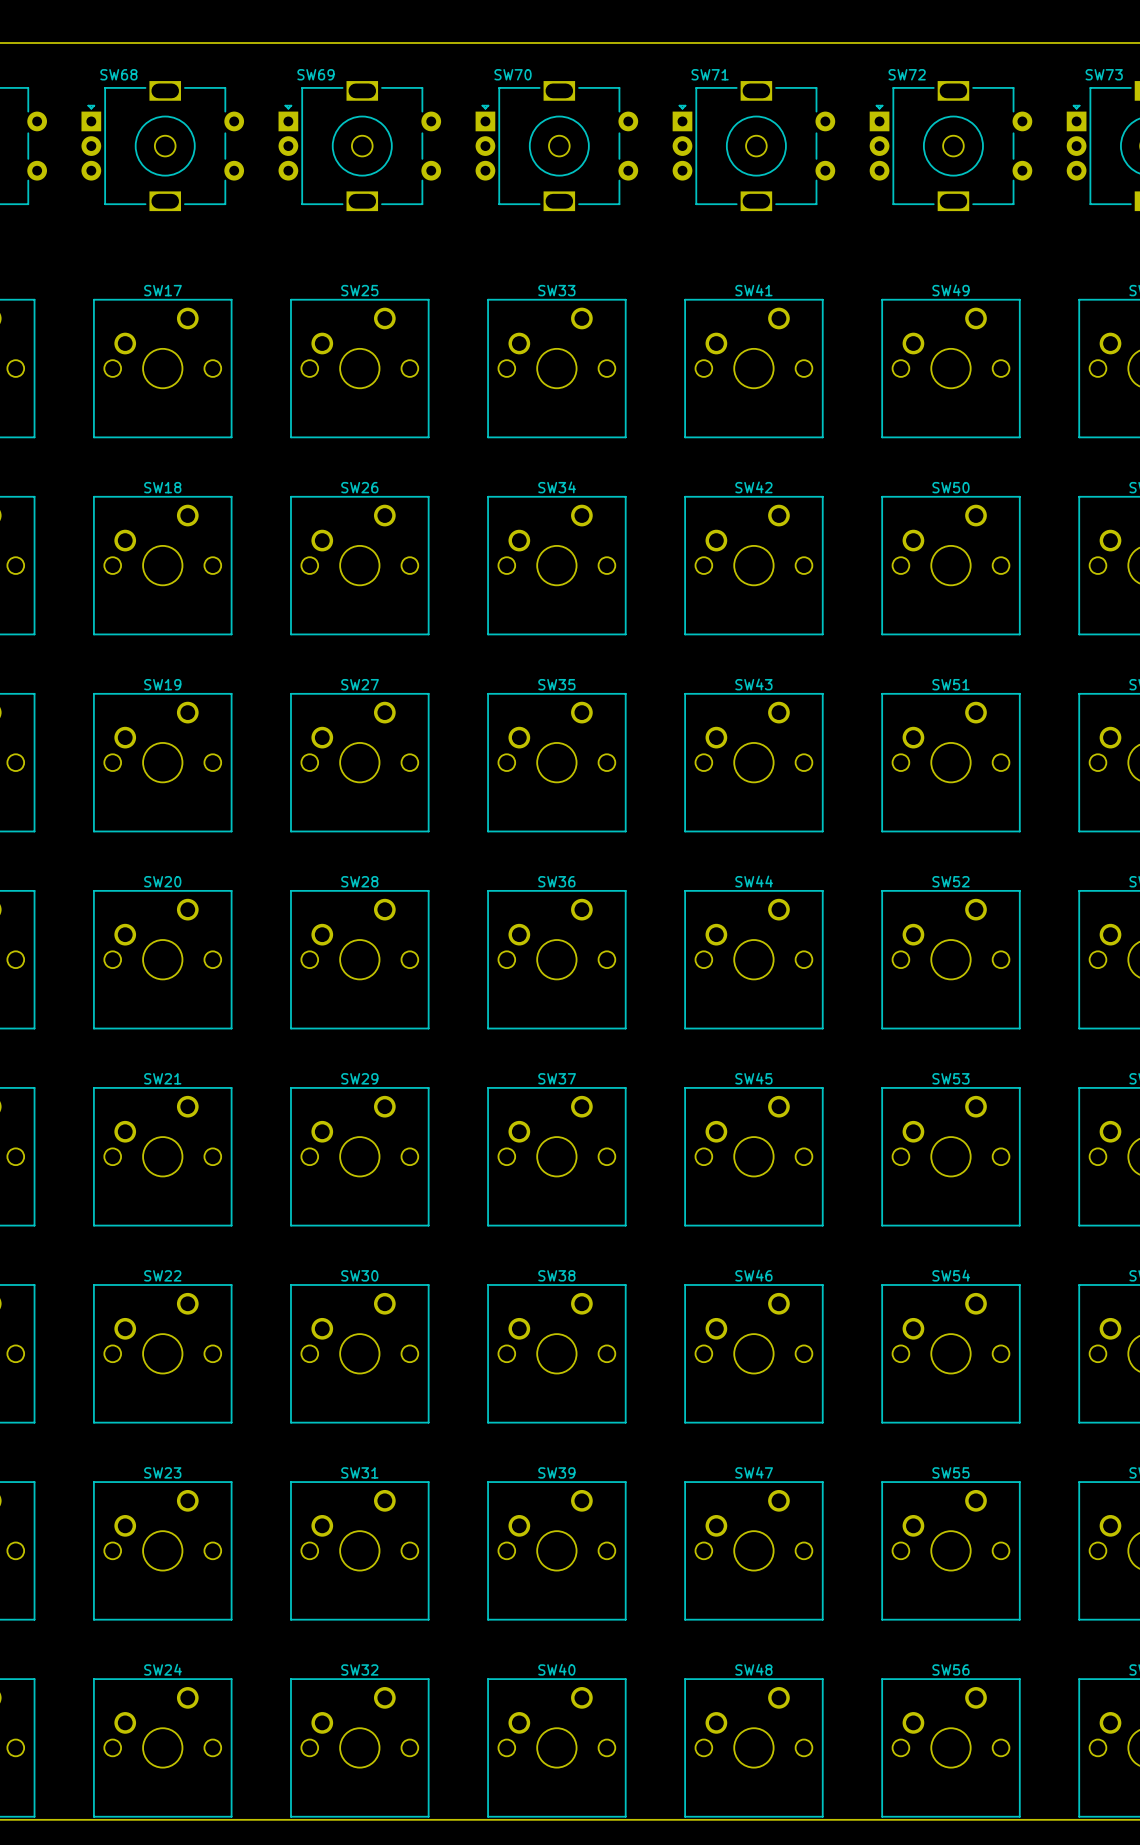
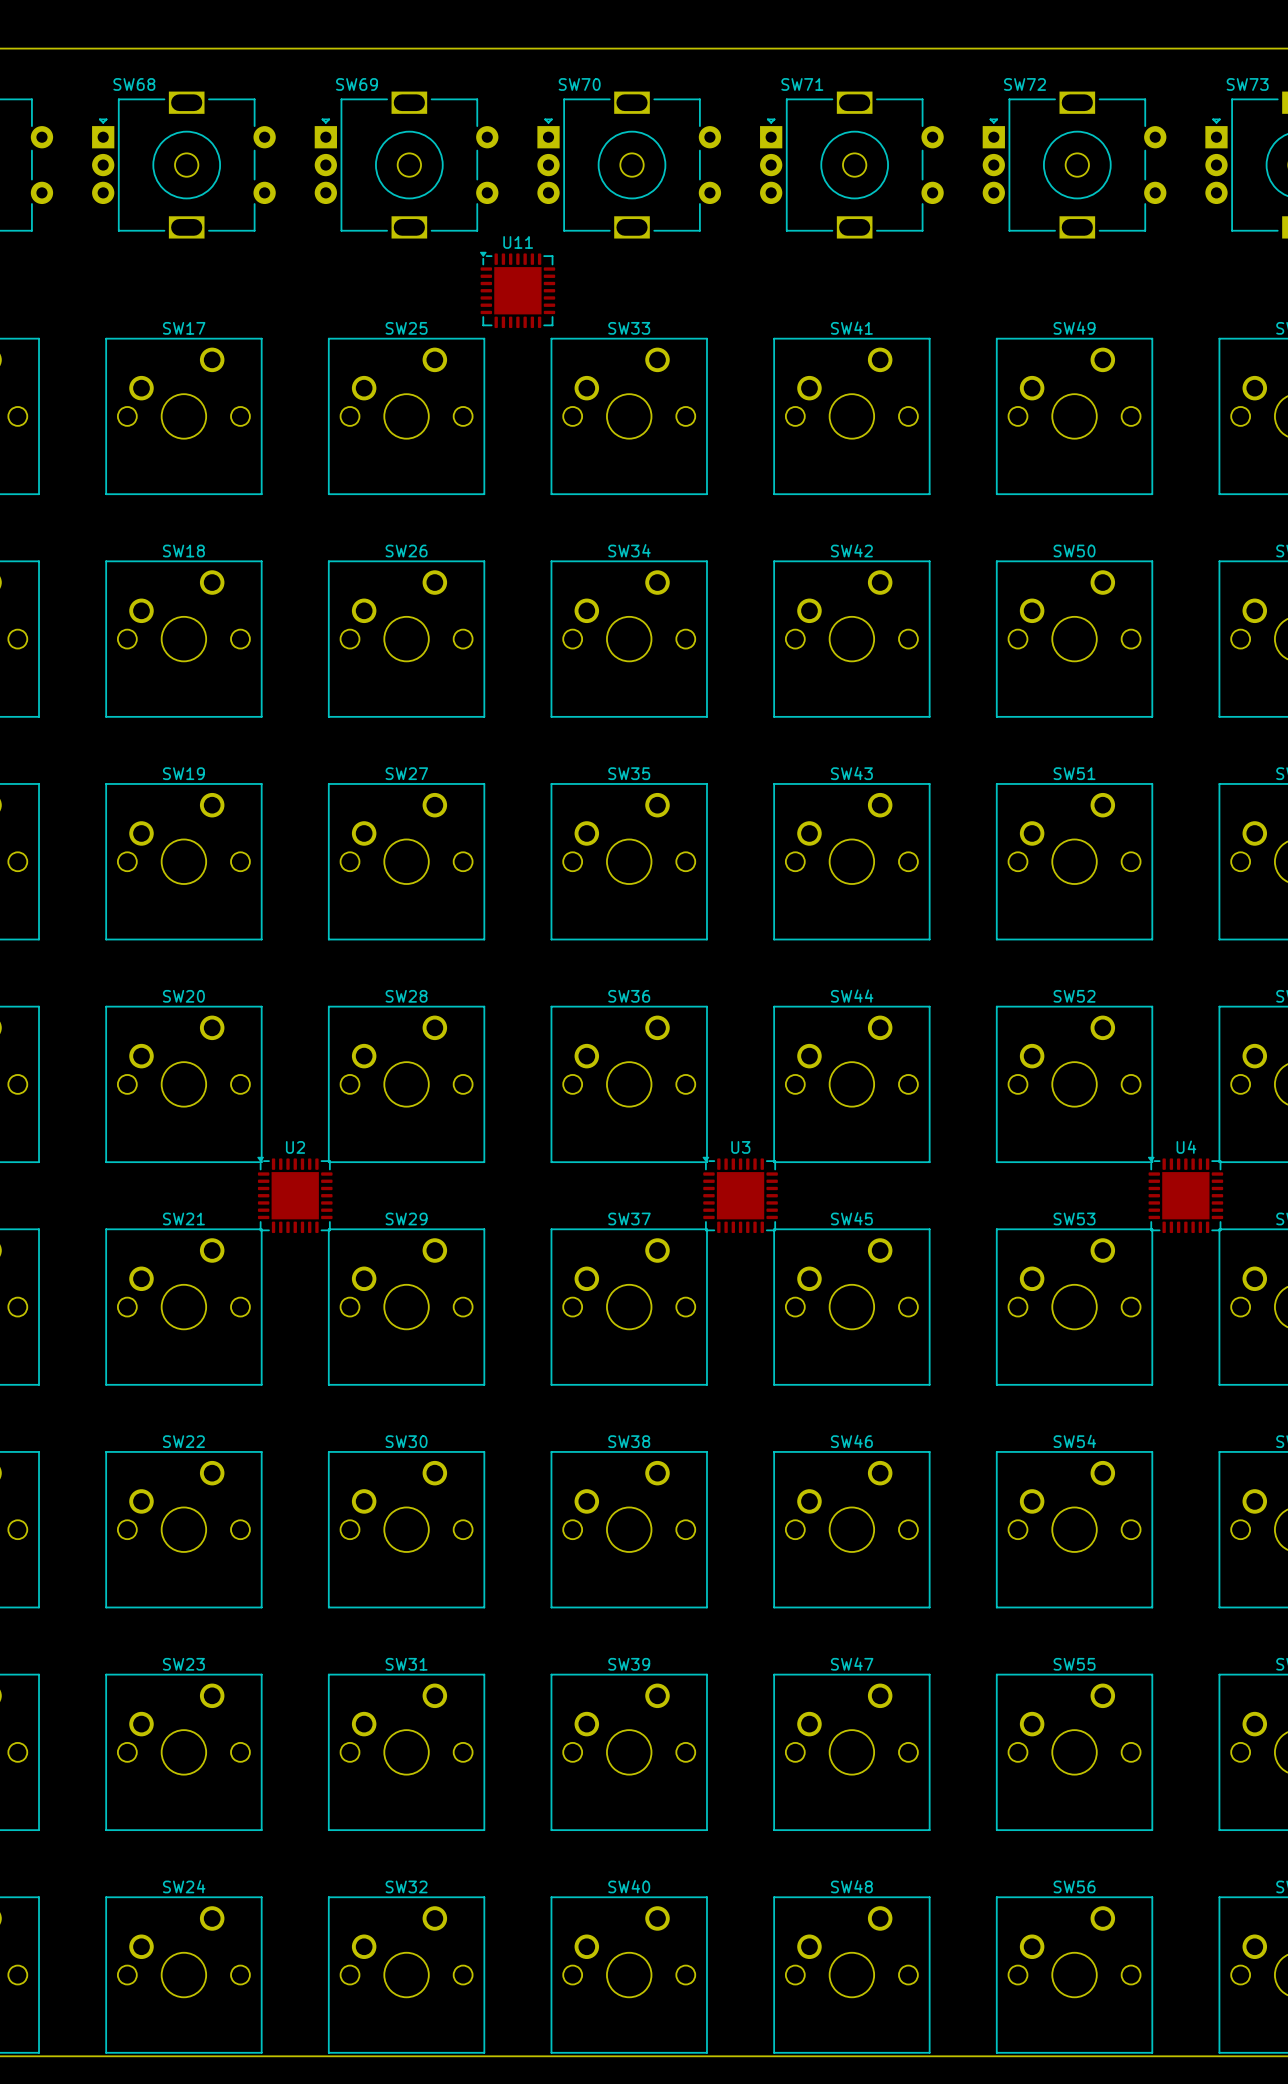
U11: none -> (517, 289)
U2: none -> (294, 1194)
U3: none -> (740, 1194)
U4: none -> (1185, 1194)

